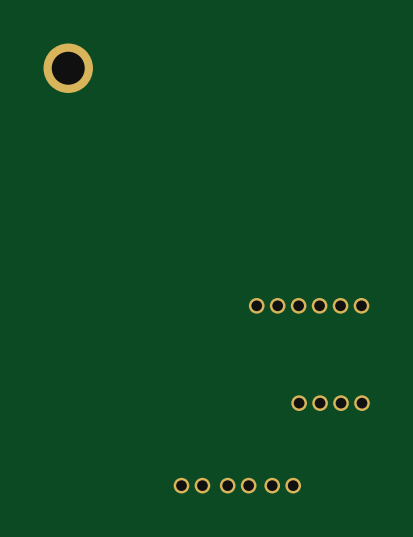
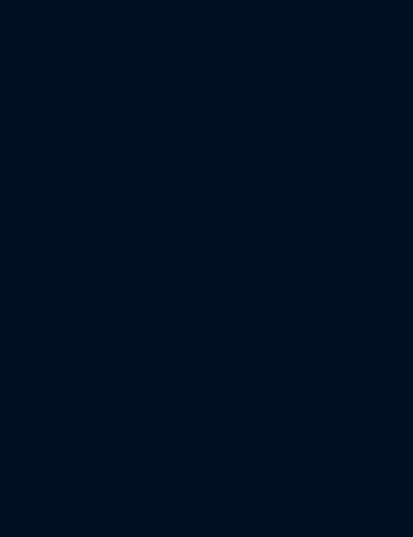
part: (68, 68) -> none
part: (309, 305) -> none
part: (330, 403) -> none
part: (191, 485) -> none
part: (238, 485) -> none
part: (282, 485) -> none

